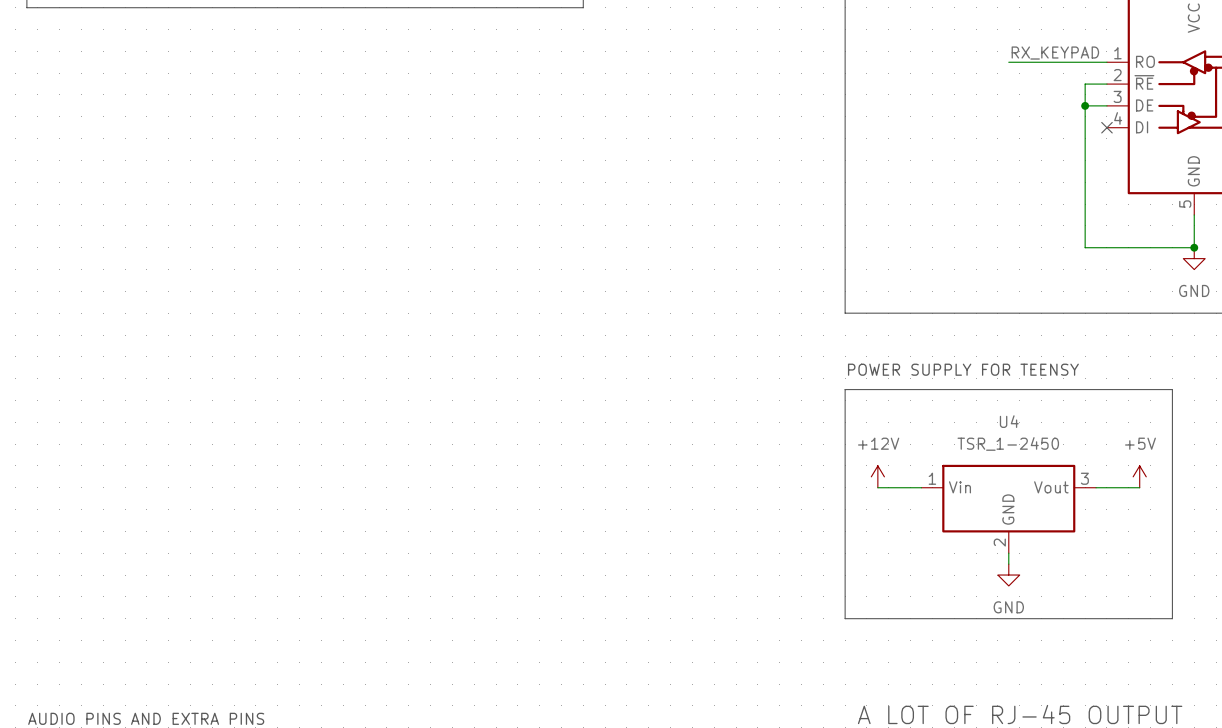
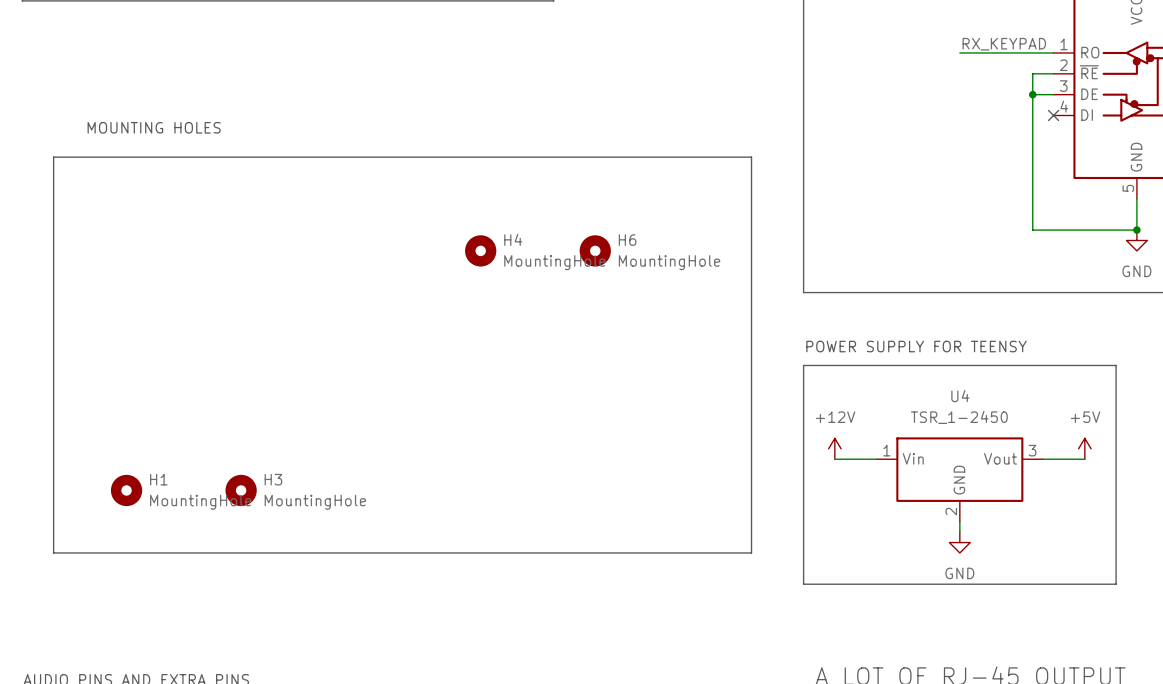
text: none -> MOUNTING HOLES (154, 127)
line: none -> (53, 157) (53, 552) (751, 552) (751, 157) (53, 157)
H4: none -> MountingHole (480, 250)
H6: none -> MountingHole (595, 250)
H1: none -> MountingHole (126, 490)
H3: none -> MountingHole (241, 490)

